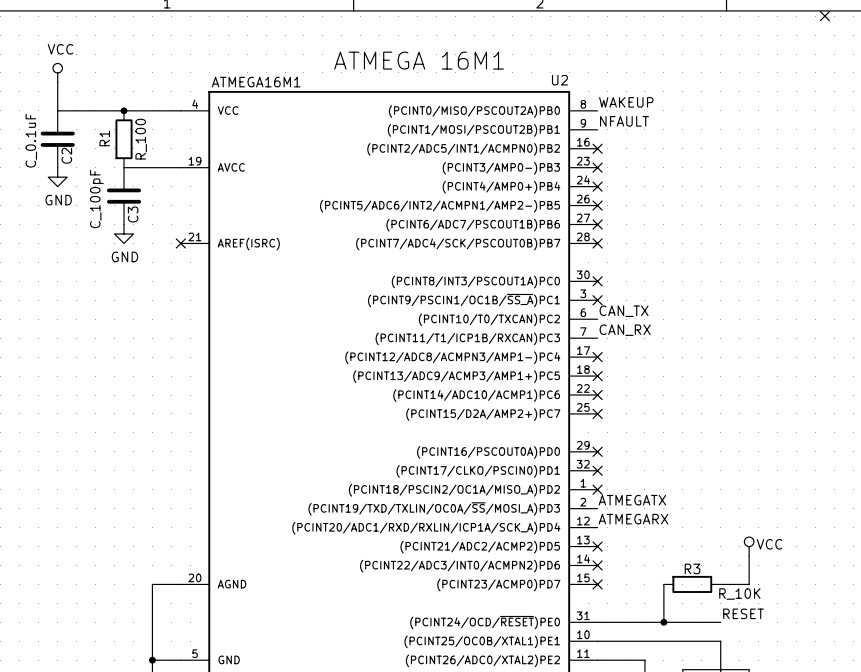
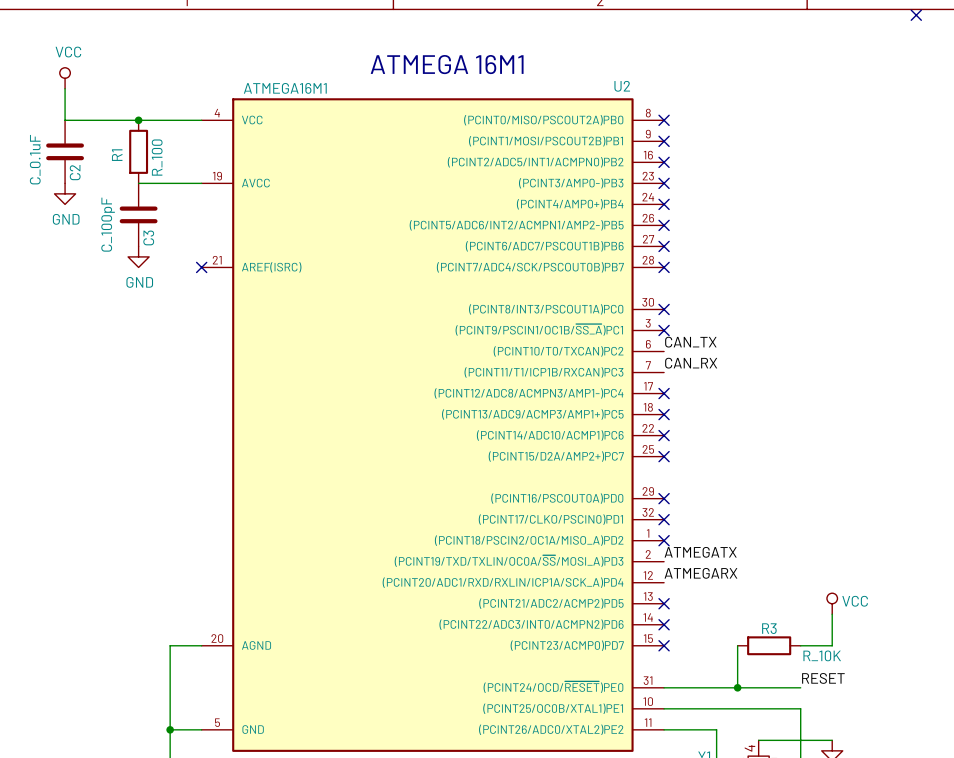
label: WAKEUP (626, 102) -> none
no-connect mark: none -> (664, 120)
label: NFAULT (624, 121) -> none
no-connect mark: none -> (664, 141)

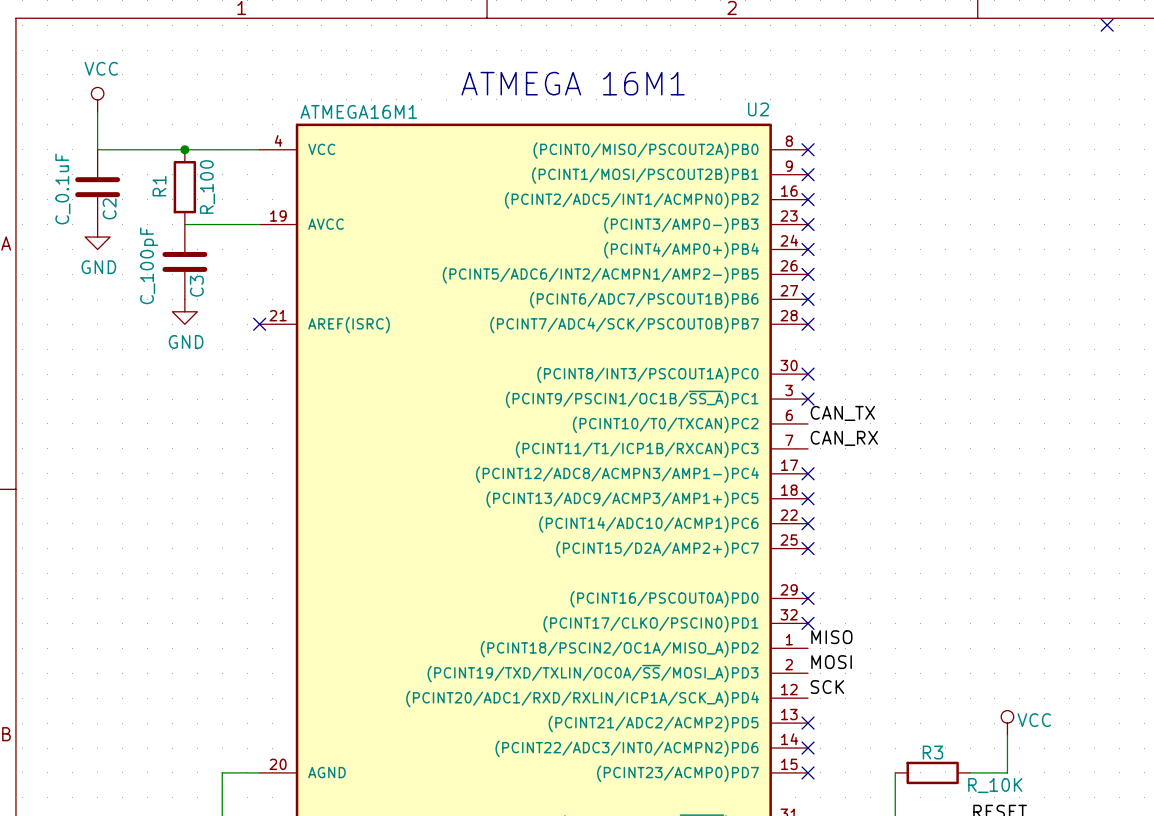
label: none -> MISO (831, 637)
no-connect mark: (664, 540) -> none
label: ATMEGATX (700, 552) -> MOSI (831, 662)
label: ATMEGARX (700, 573) -> SCK (827, 687)

